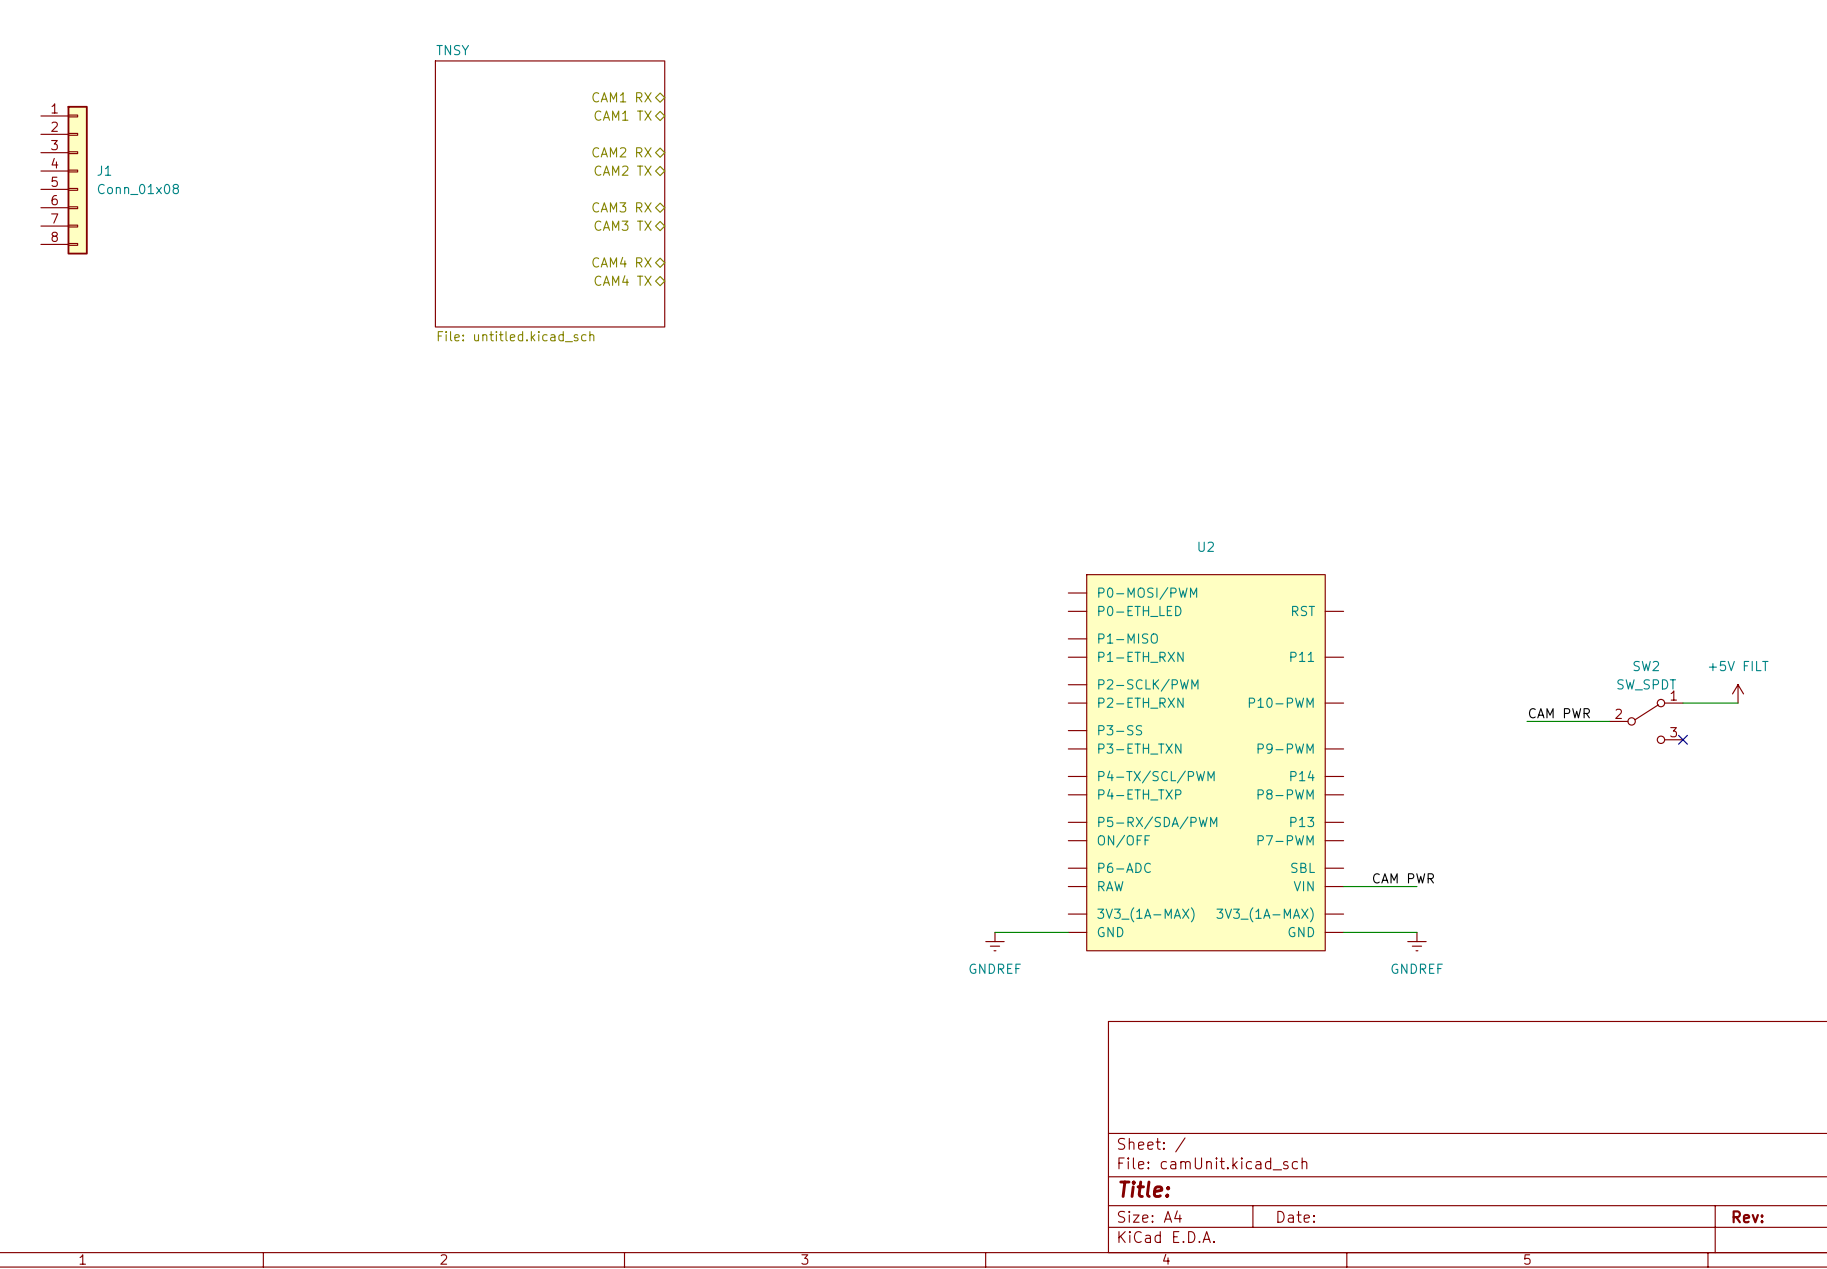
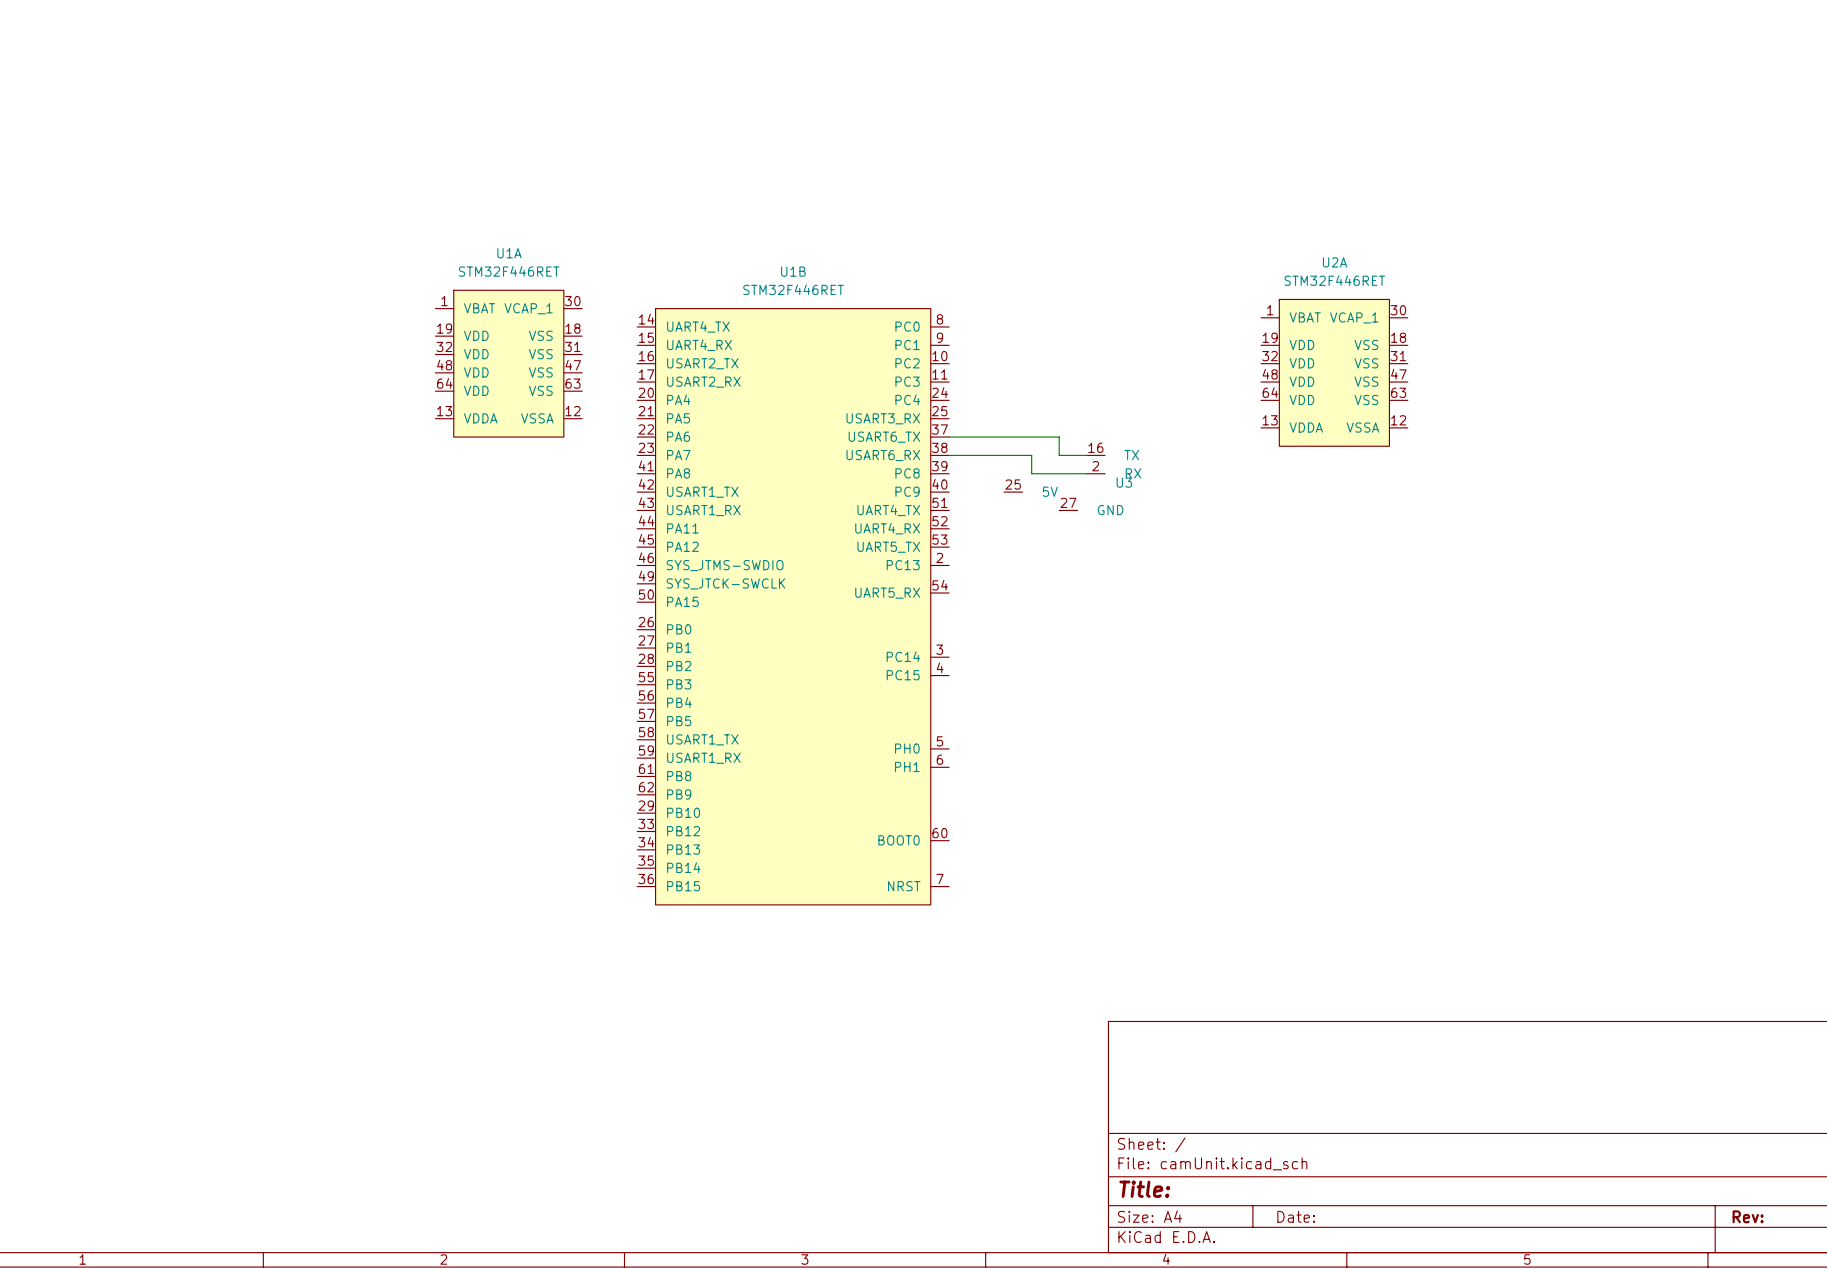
hierarchical label: CAM1 RX (622, 97) -> none
hierarchical label: CAM1 TX (623, 115) -> none
hierarchical label: CAM2 RX (622, 152) -> none
hierarchical label: CAM2 TX (623, 170) -> none
J1: Conn_01x08 (64, 180) -> none
sheet TNSY: File: untitled.kicad_sch (550, 193) -> none
hierarchical label: CAM3 RX (622, 207) -> none
hierarchical label: CAM3 TX (623, 225) -> none
hierarchical label: CAM4 RX (622, 262) -> none
hierarchical label: CAM4 TX (623, 280) -> none
U1A: none -> STM32F446RET (508, 363)
U2A: none -> STM32F446RET (1334, 372)
wire: none -> (949, 437) (1059, 437) (1059, 455) (1086, 455)
wire: none -> (949, 455) (1031, 455) (1031, 473) (1086, 473)
U3: none -> (1054, 482)
U1B: none -> STM32F446RET (793, 606)
power symbol: +5V FILT (1738, 693) -> none
wire: (1682, 703) (1738, 703) -> none
label: CAM PWR (1559, 713) -> none
wire: (1527, 721) (1609, 721) -> none
SW2: SW_SPDT (1646, 721) -> none
no-connect mark: (1682, 739) -> none
U2: (1205, 762) -> none
label: CAM PWR (1403, 878) -> none
wire: (1343, 886) (1416, 886) -> none
wire: (994, 932) (1068, 932) -> none
wire: (1343, 932) (1416, 932) -> none
power symbol: GNDREF (994, 941) -> none
power symbol: GNDREF (1416, 941) -> none

